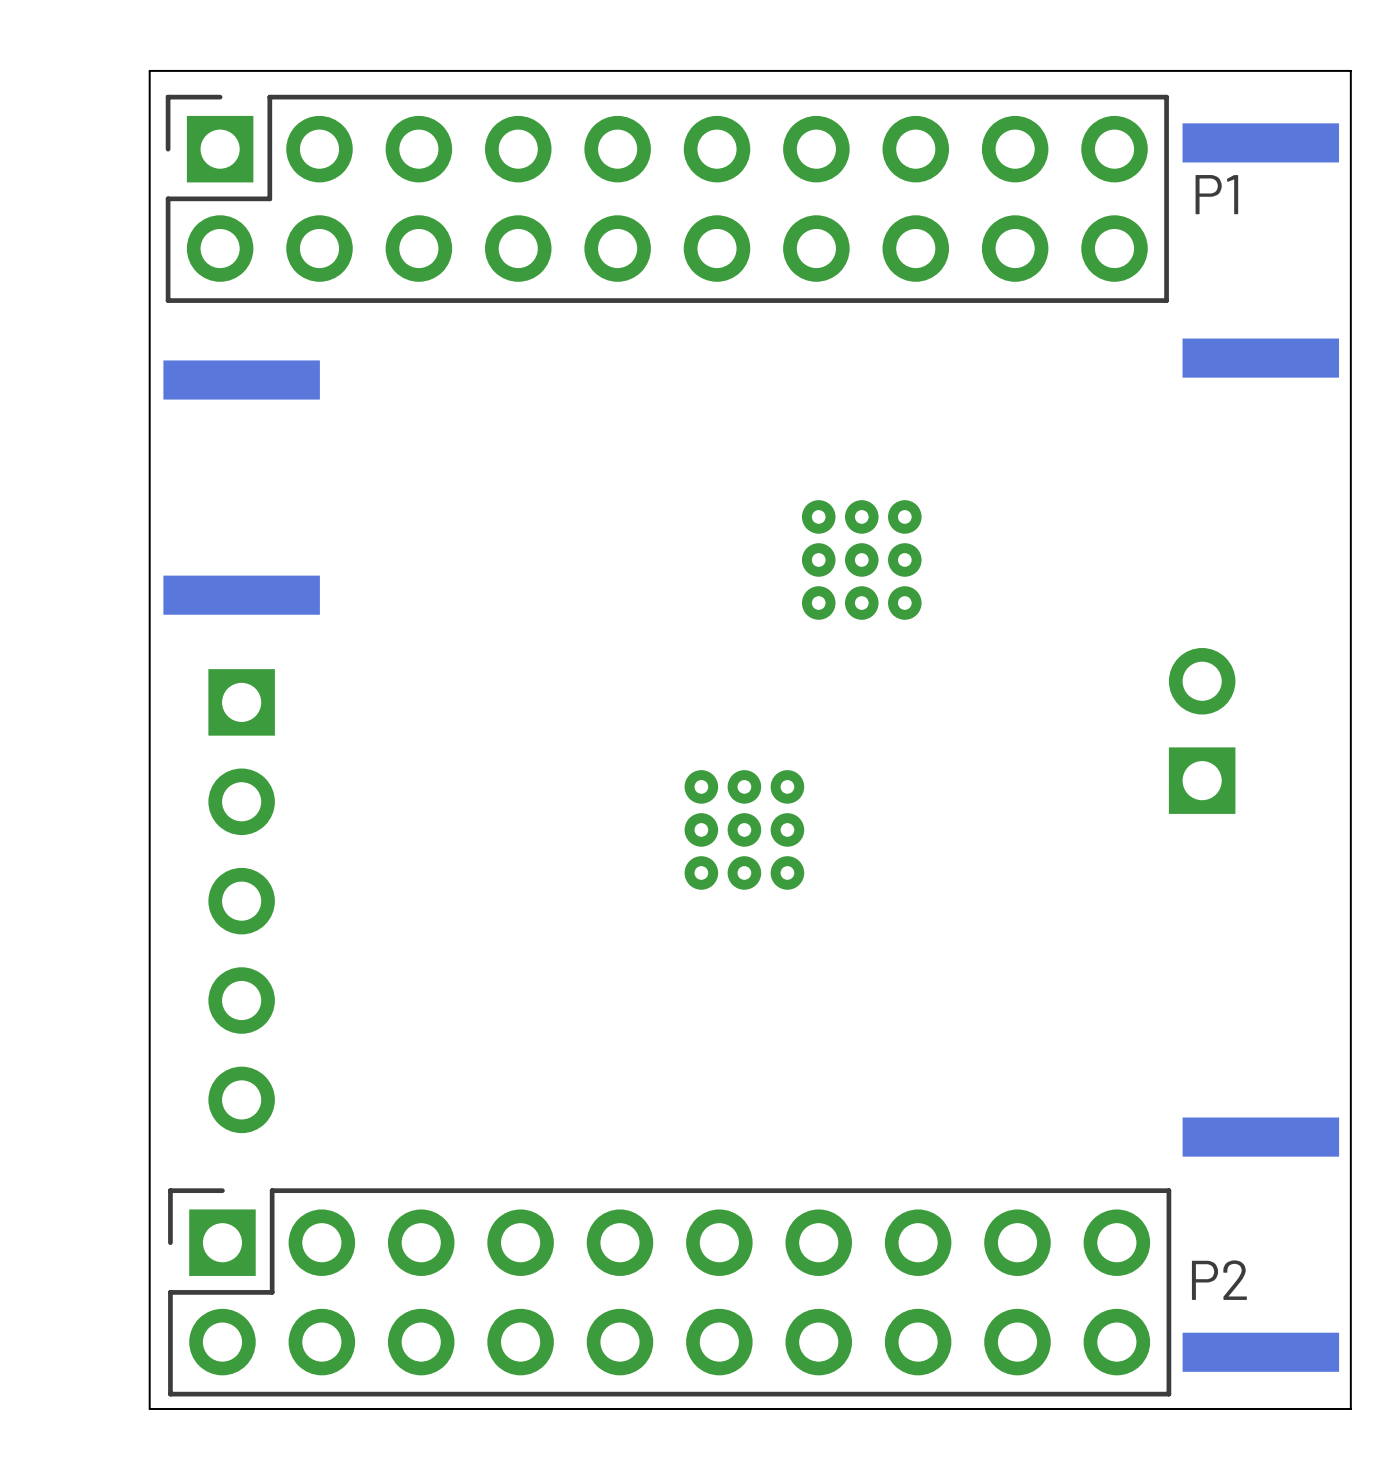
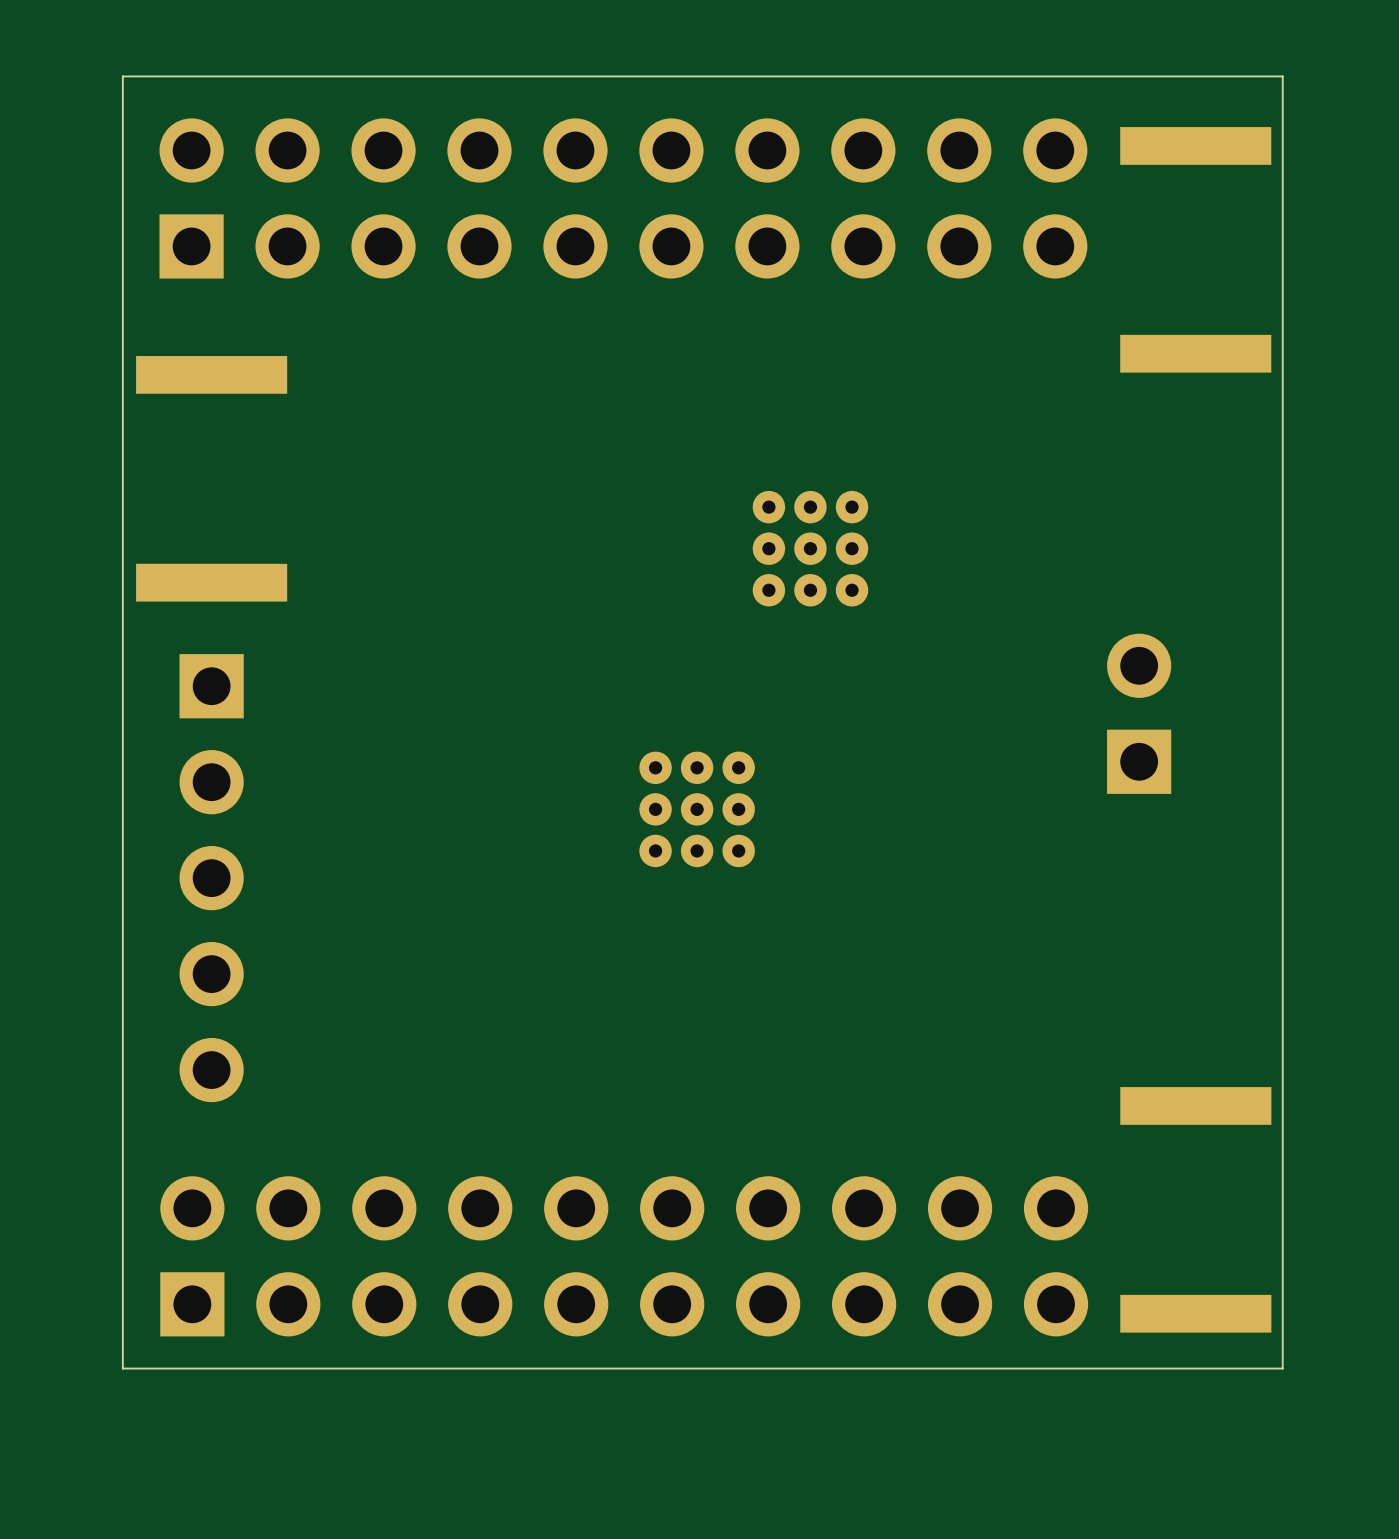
P1 side: bottom (667, 198) -> top (623, 198)
P2 side: bottom (669, 1292) -> top (624, 1256)

